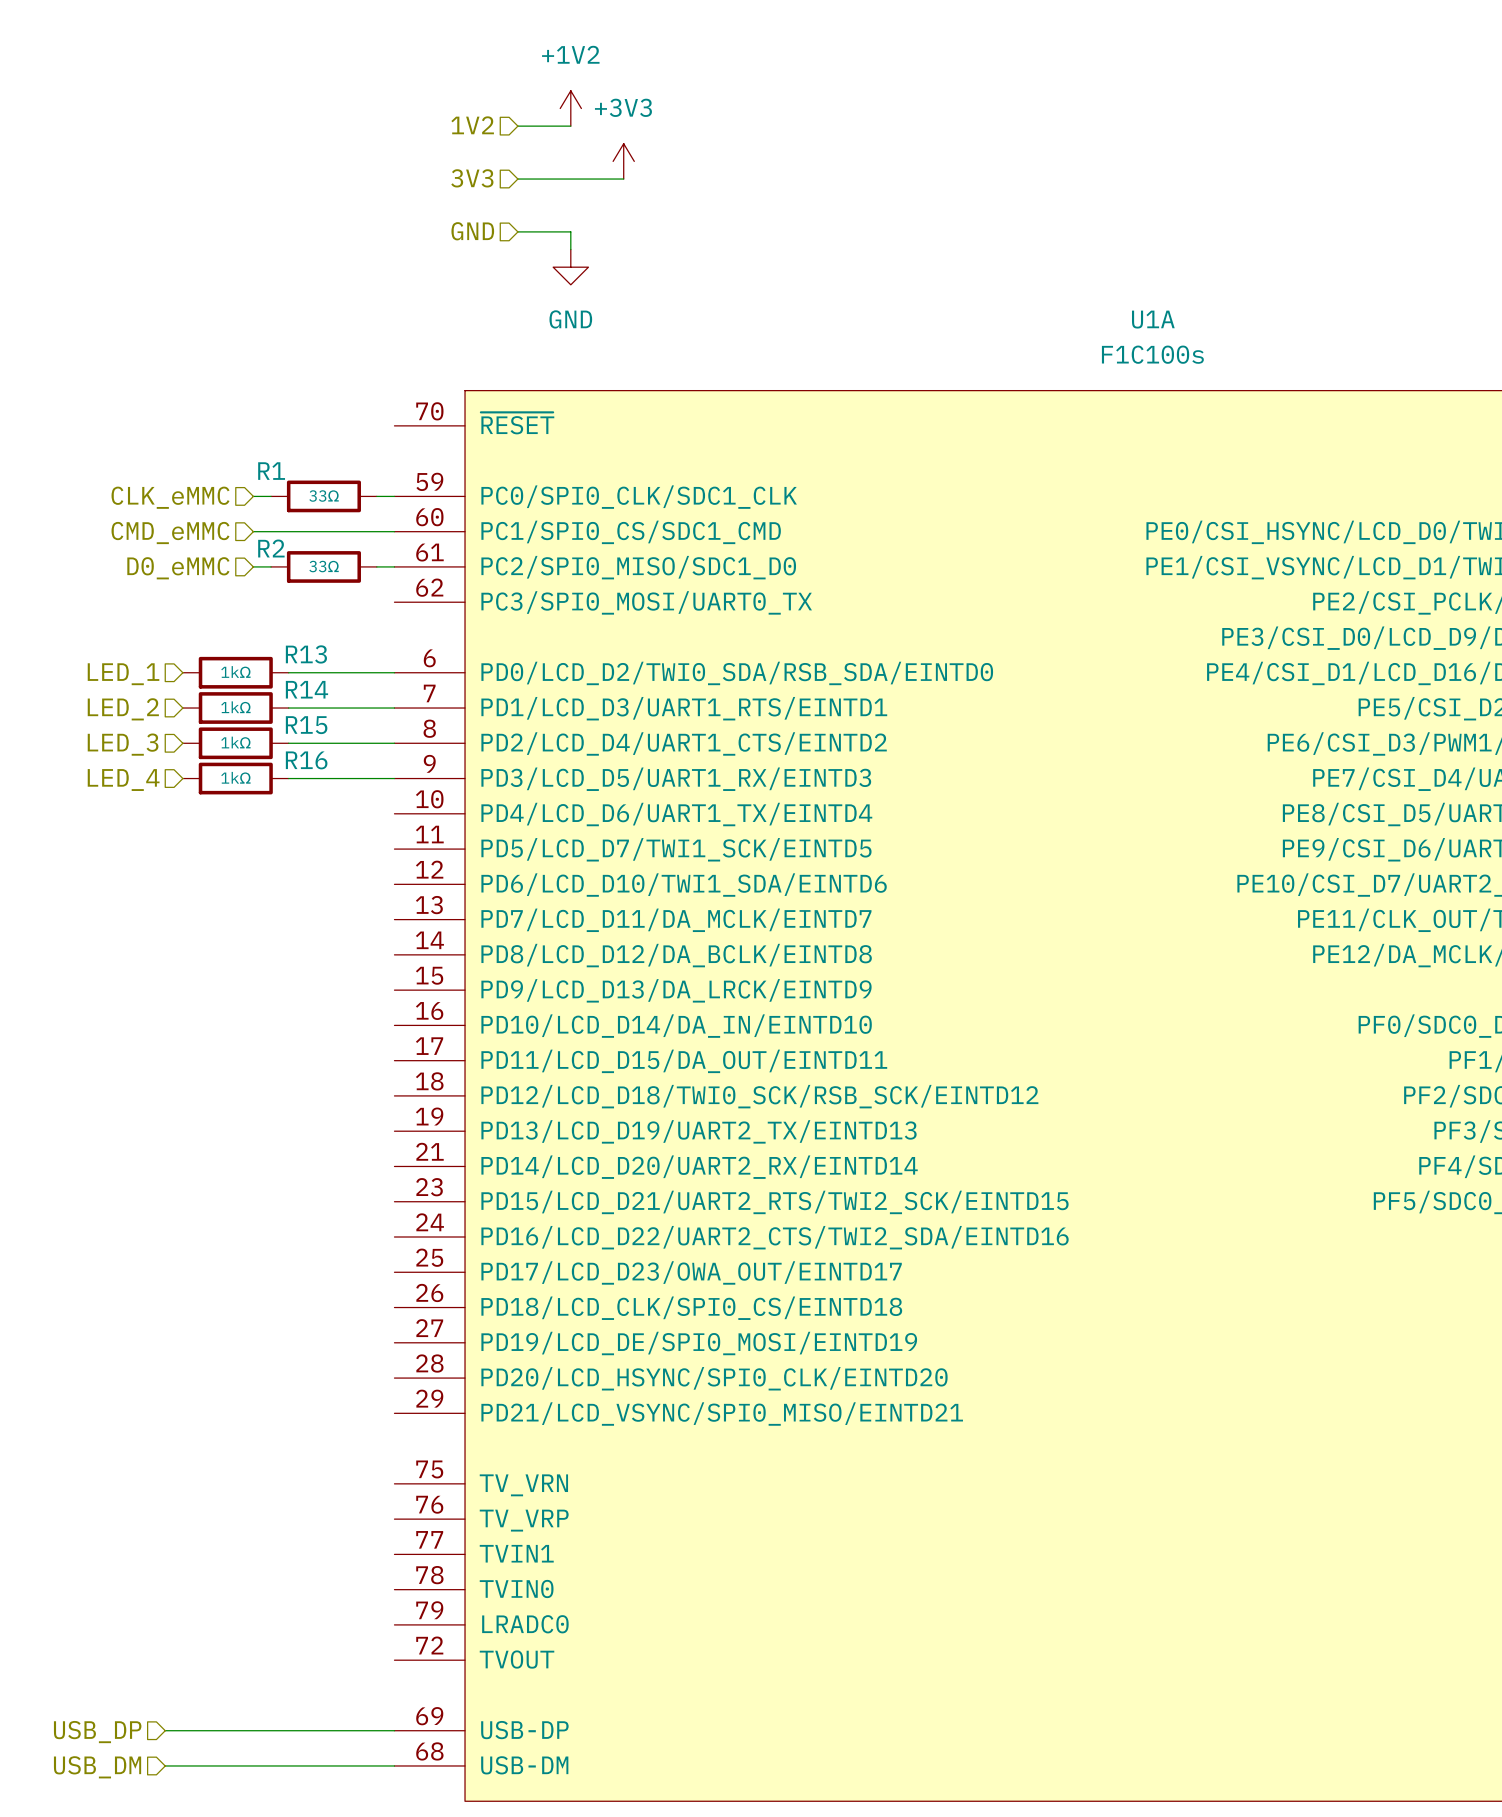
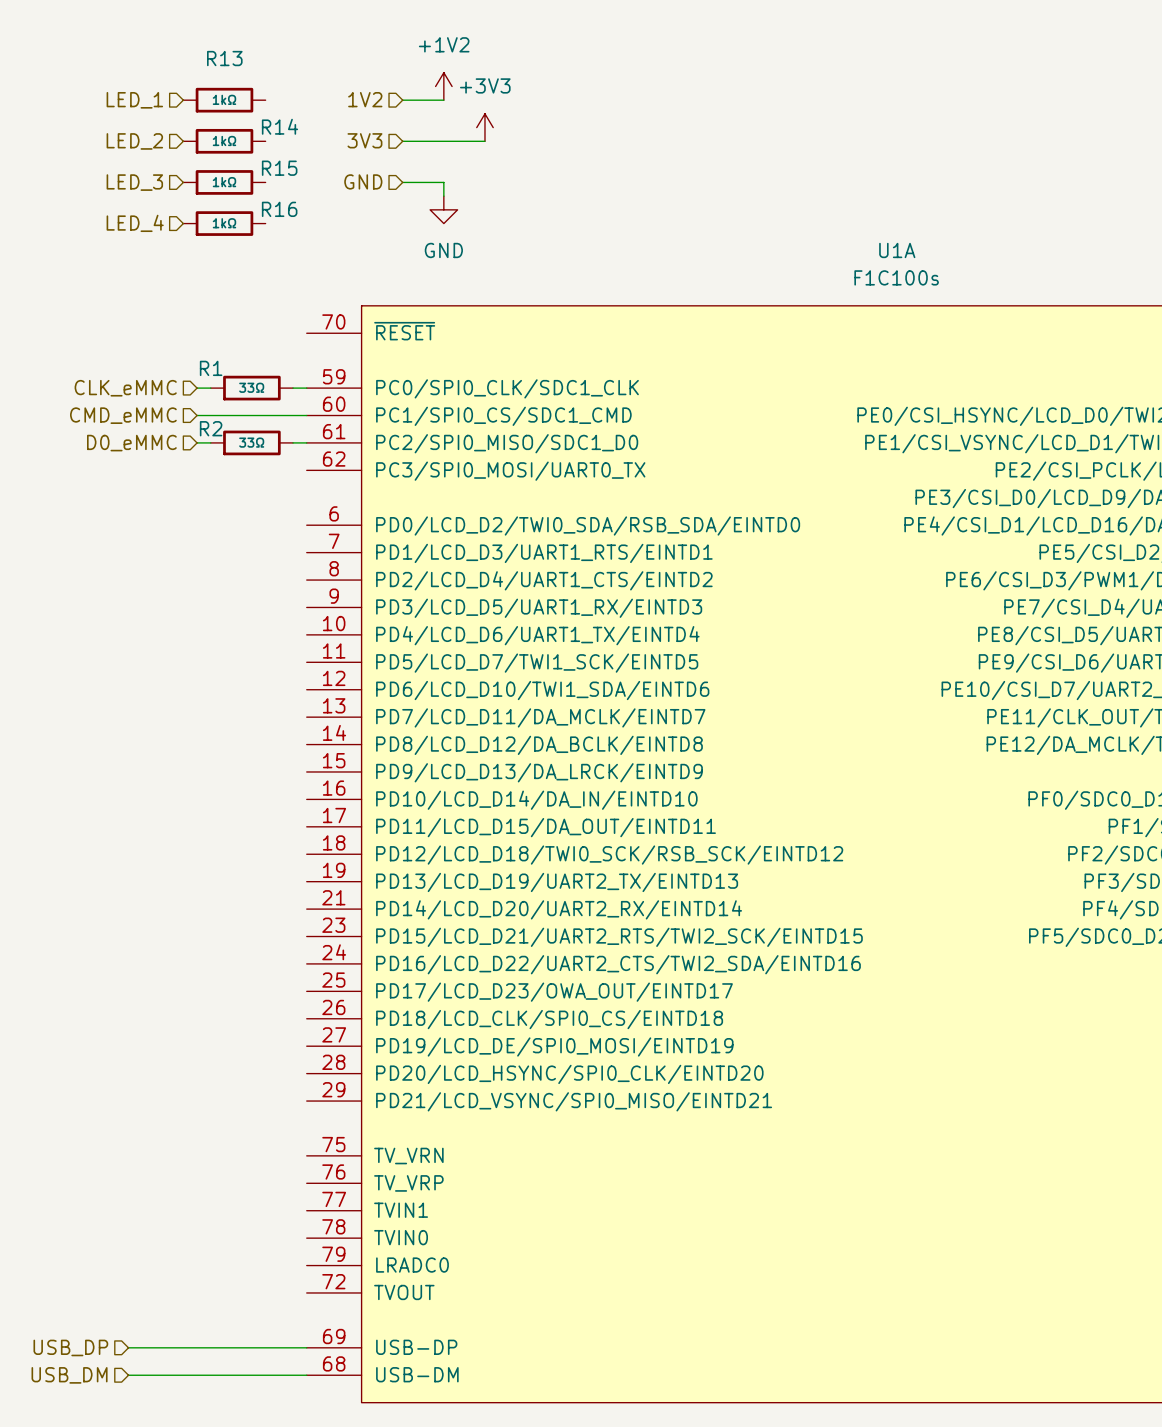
hierarchical label: none -> LED_1 (134, 100)
hierarchical label: none -> LED_2 (134, 141)
hierarchical label: none -> LED_3 (134, 182)
hierarchical label: none -> LED_4 (135, 223)
R13 name position: R13 (306, 654) -> R13 (224, 58)
R13 position: (235, 672) -> (224, 100)
wire: (288, 672) (394, 672) -> none
hierarchical label: LED_1 (123, 674) -> none
R14 position: (235, 708) -> (224, 141)
wire: (288, 708) (394, 708) -> none
hierarchical label: LED_2 (123, 709) -> none
R15 position: (235, 743) -> (224, 182)
wire: (288, 743) (394, 743) -> none
hierarchical label: LED_3 (123, 744) -> none
R16 position: (235, 778) -> (224, 223)
wire: (288, 778) (394, 778) -> none
hierarchical label: LED_4 (123, 780) -> none

